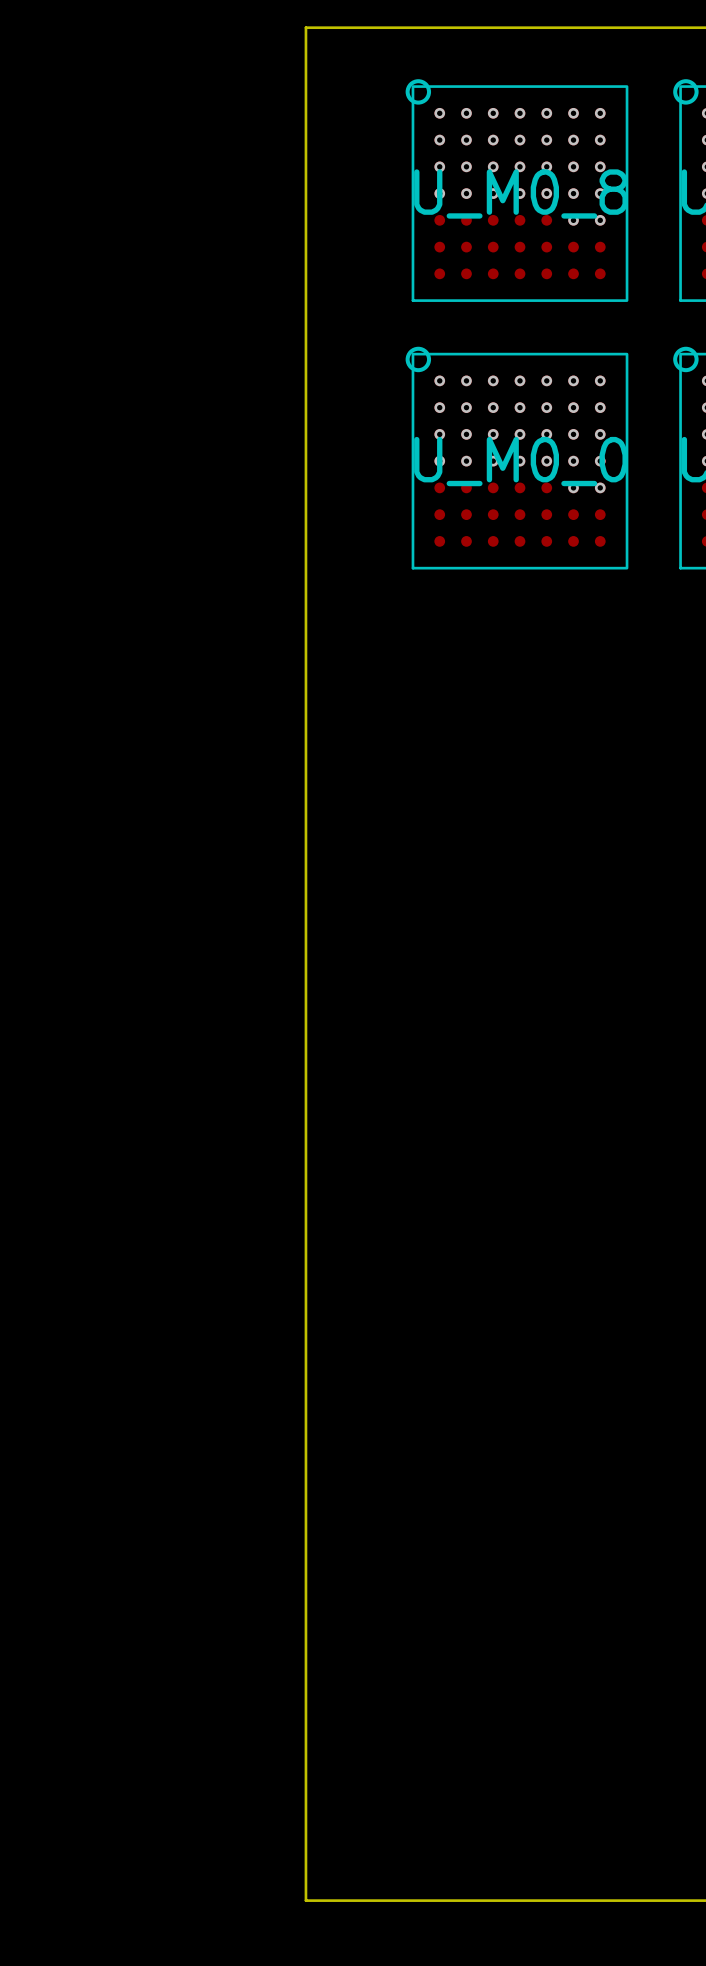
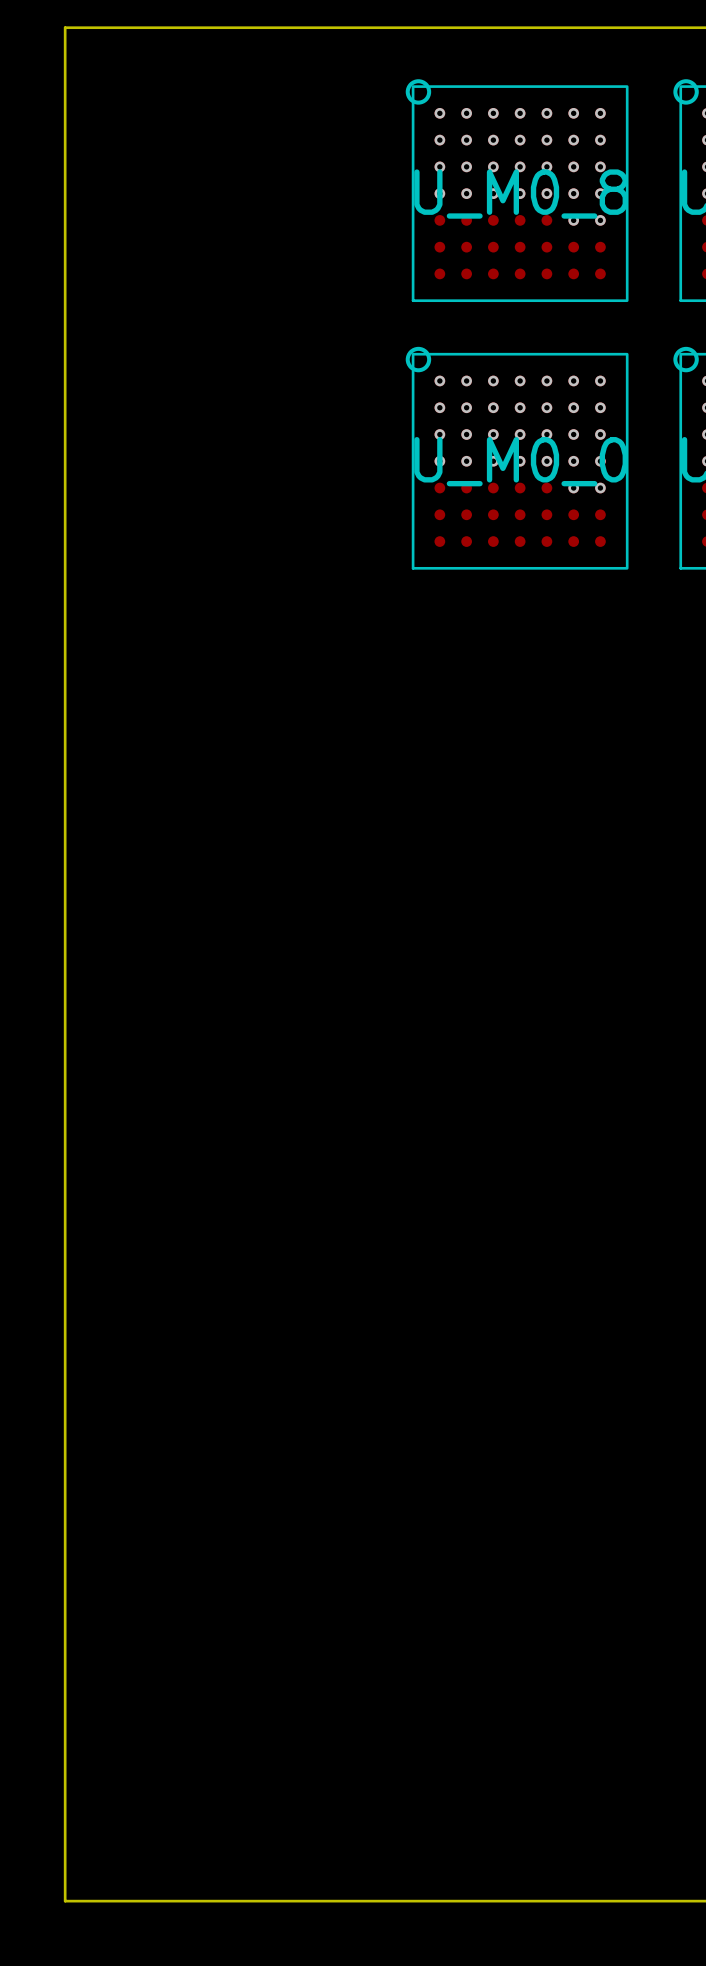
board edge: (305, 27) (305, 1900) -> (306, 27) (65, 27) (65, 1901) (306, 1901)

